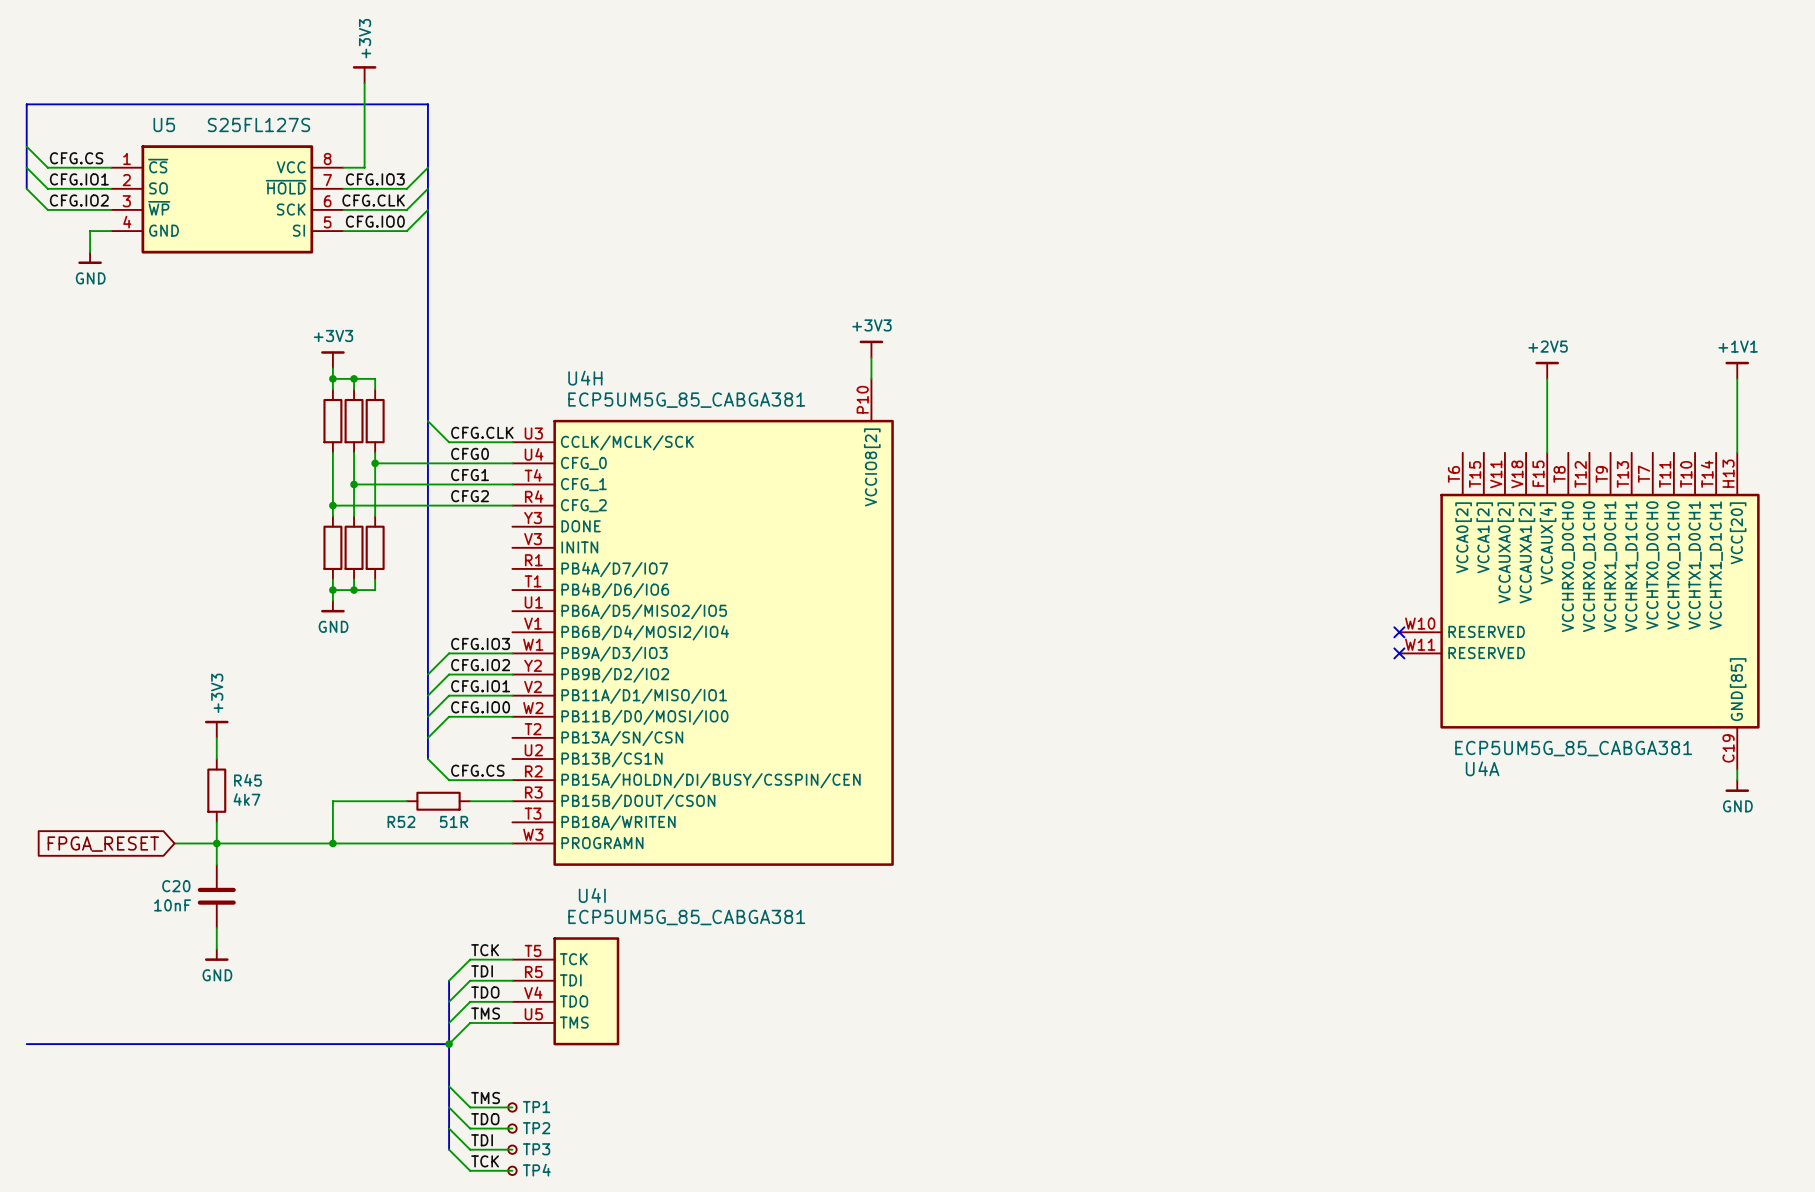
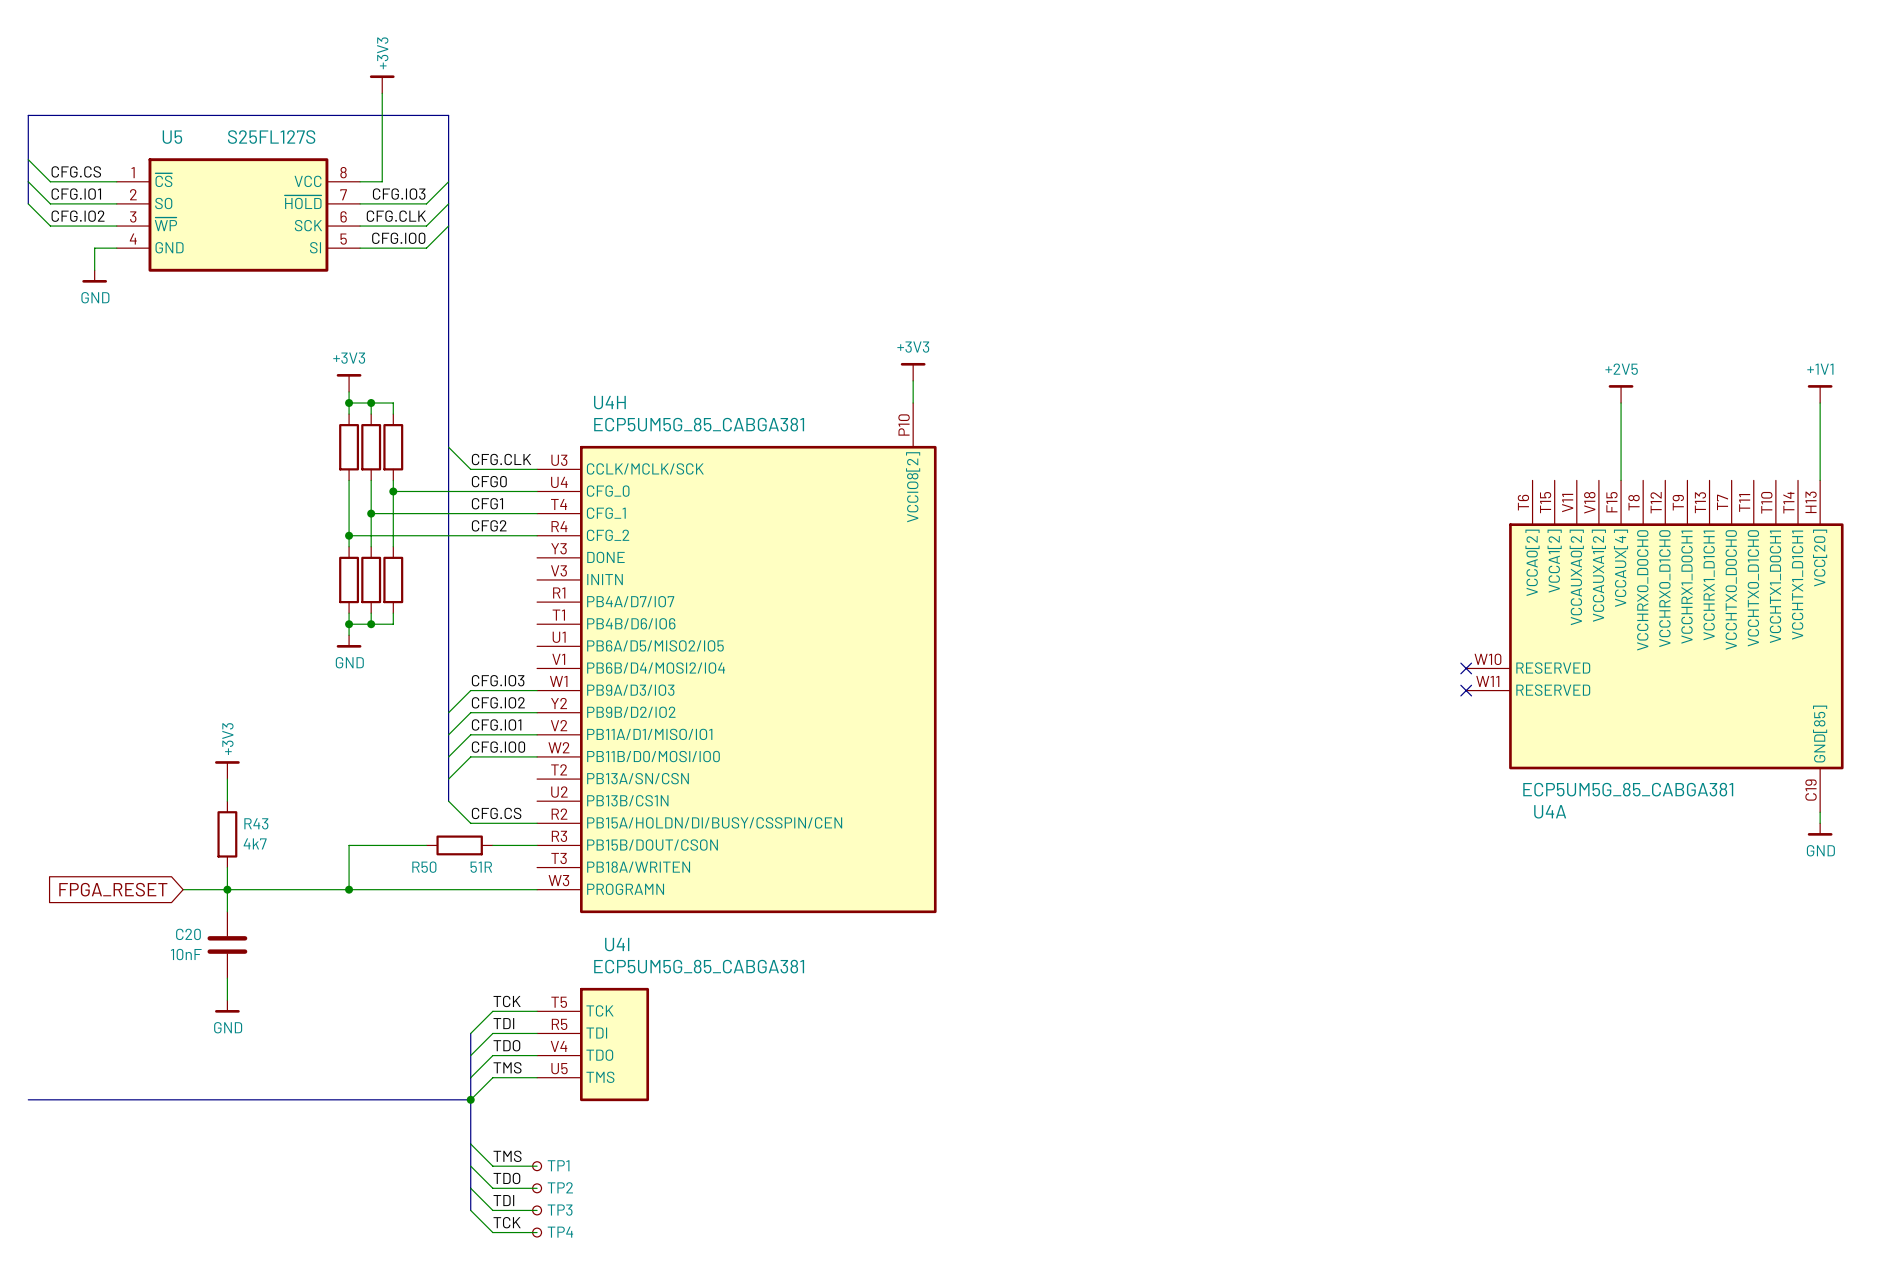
R45 name: R45 (247, 780) -> R43 (256, 823)
R52 name: R52 (401, 821) -> R50 (424, 867)

